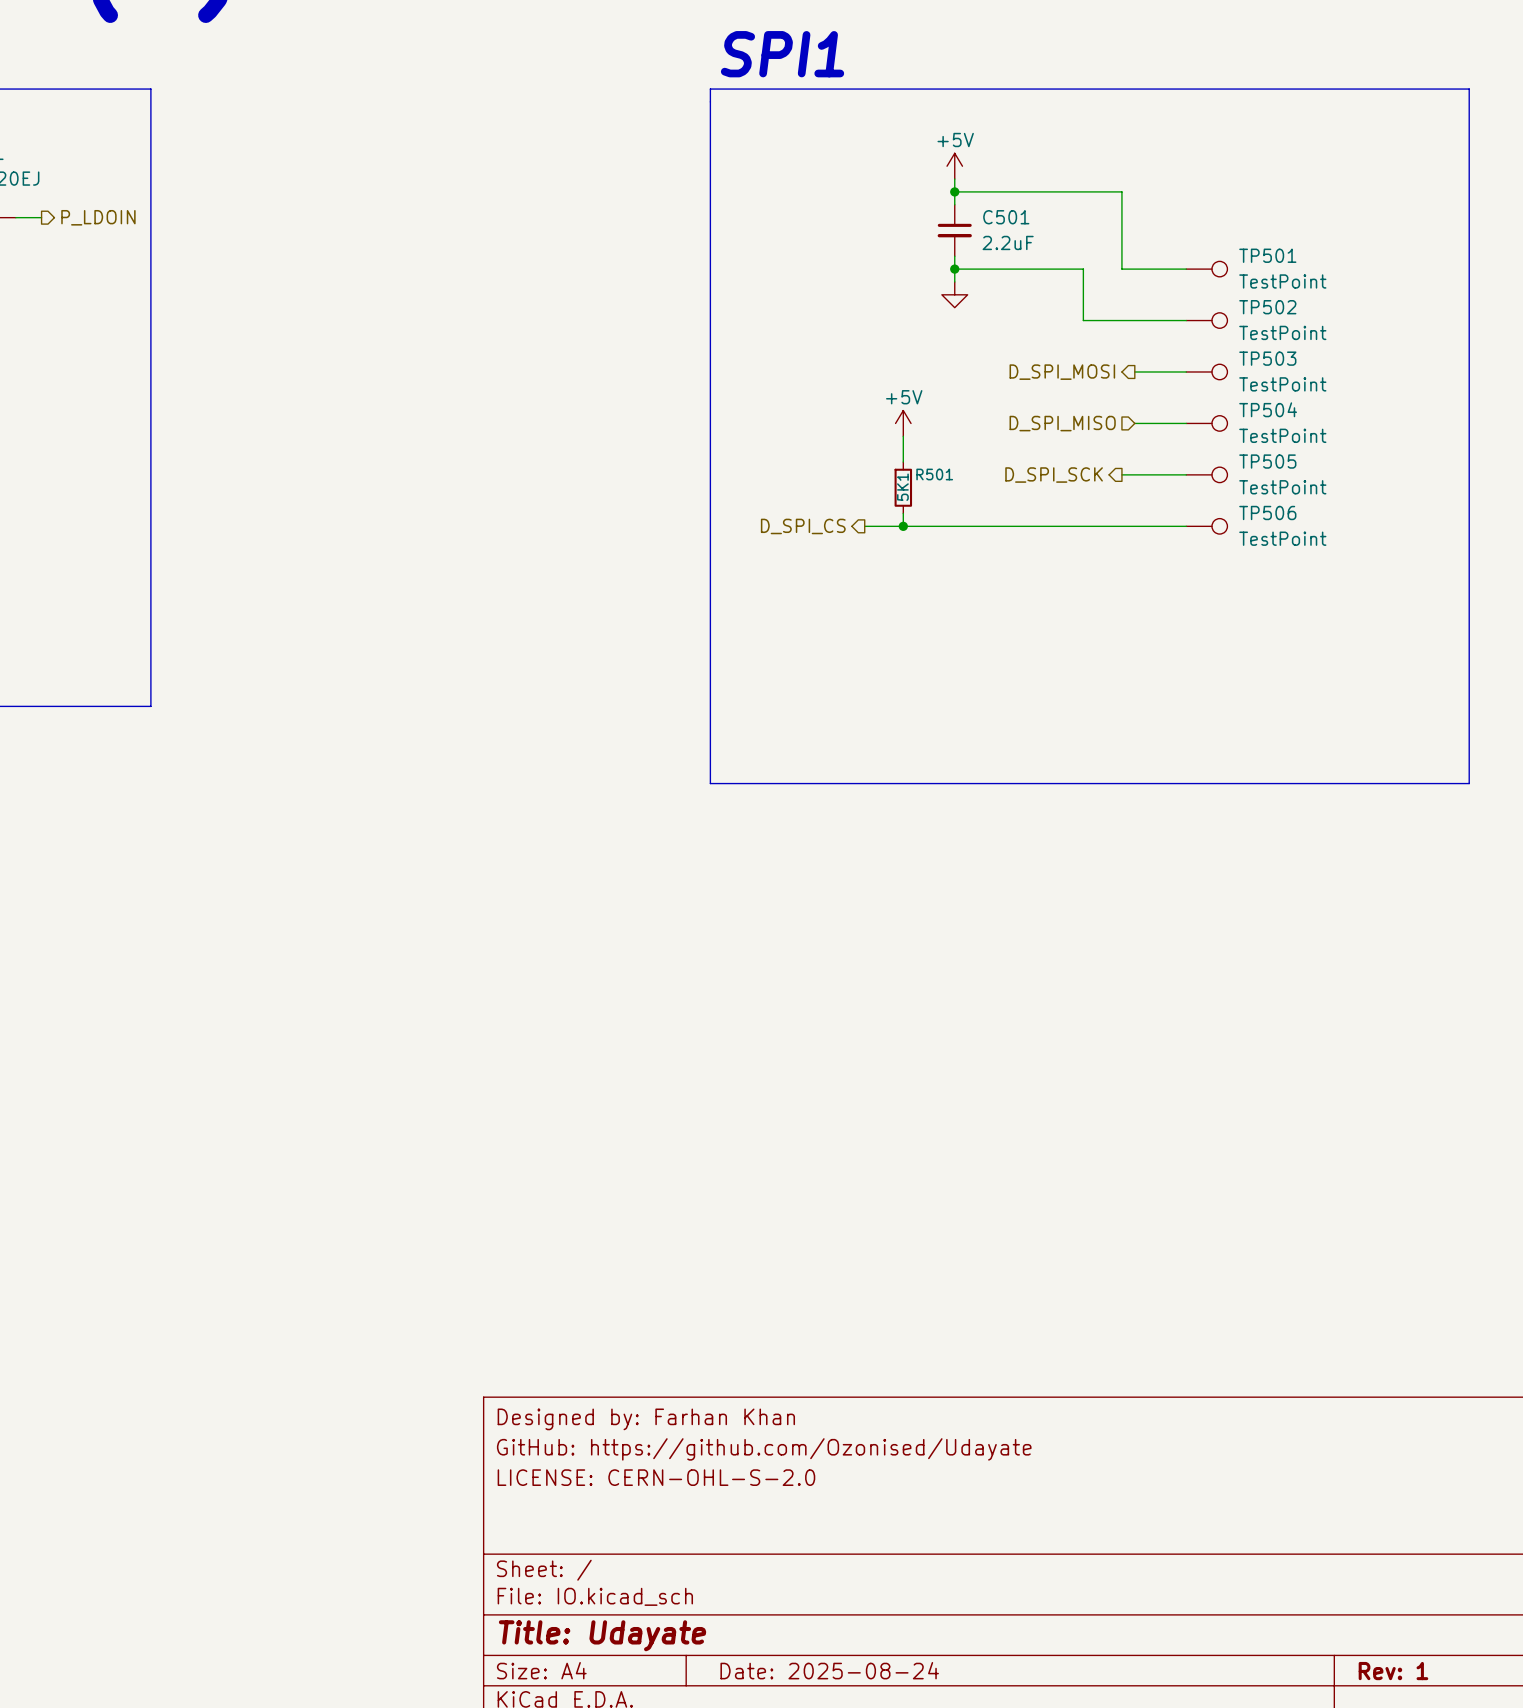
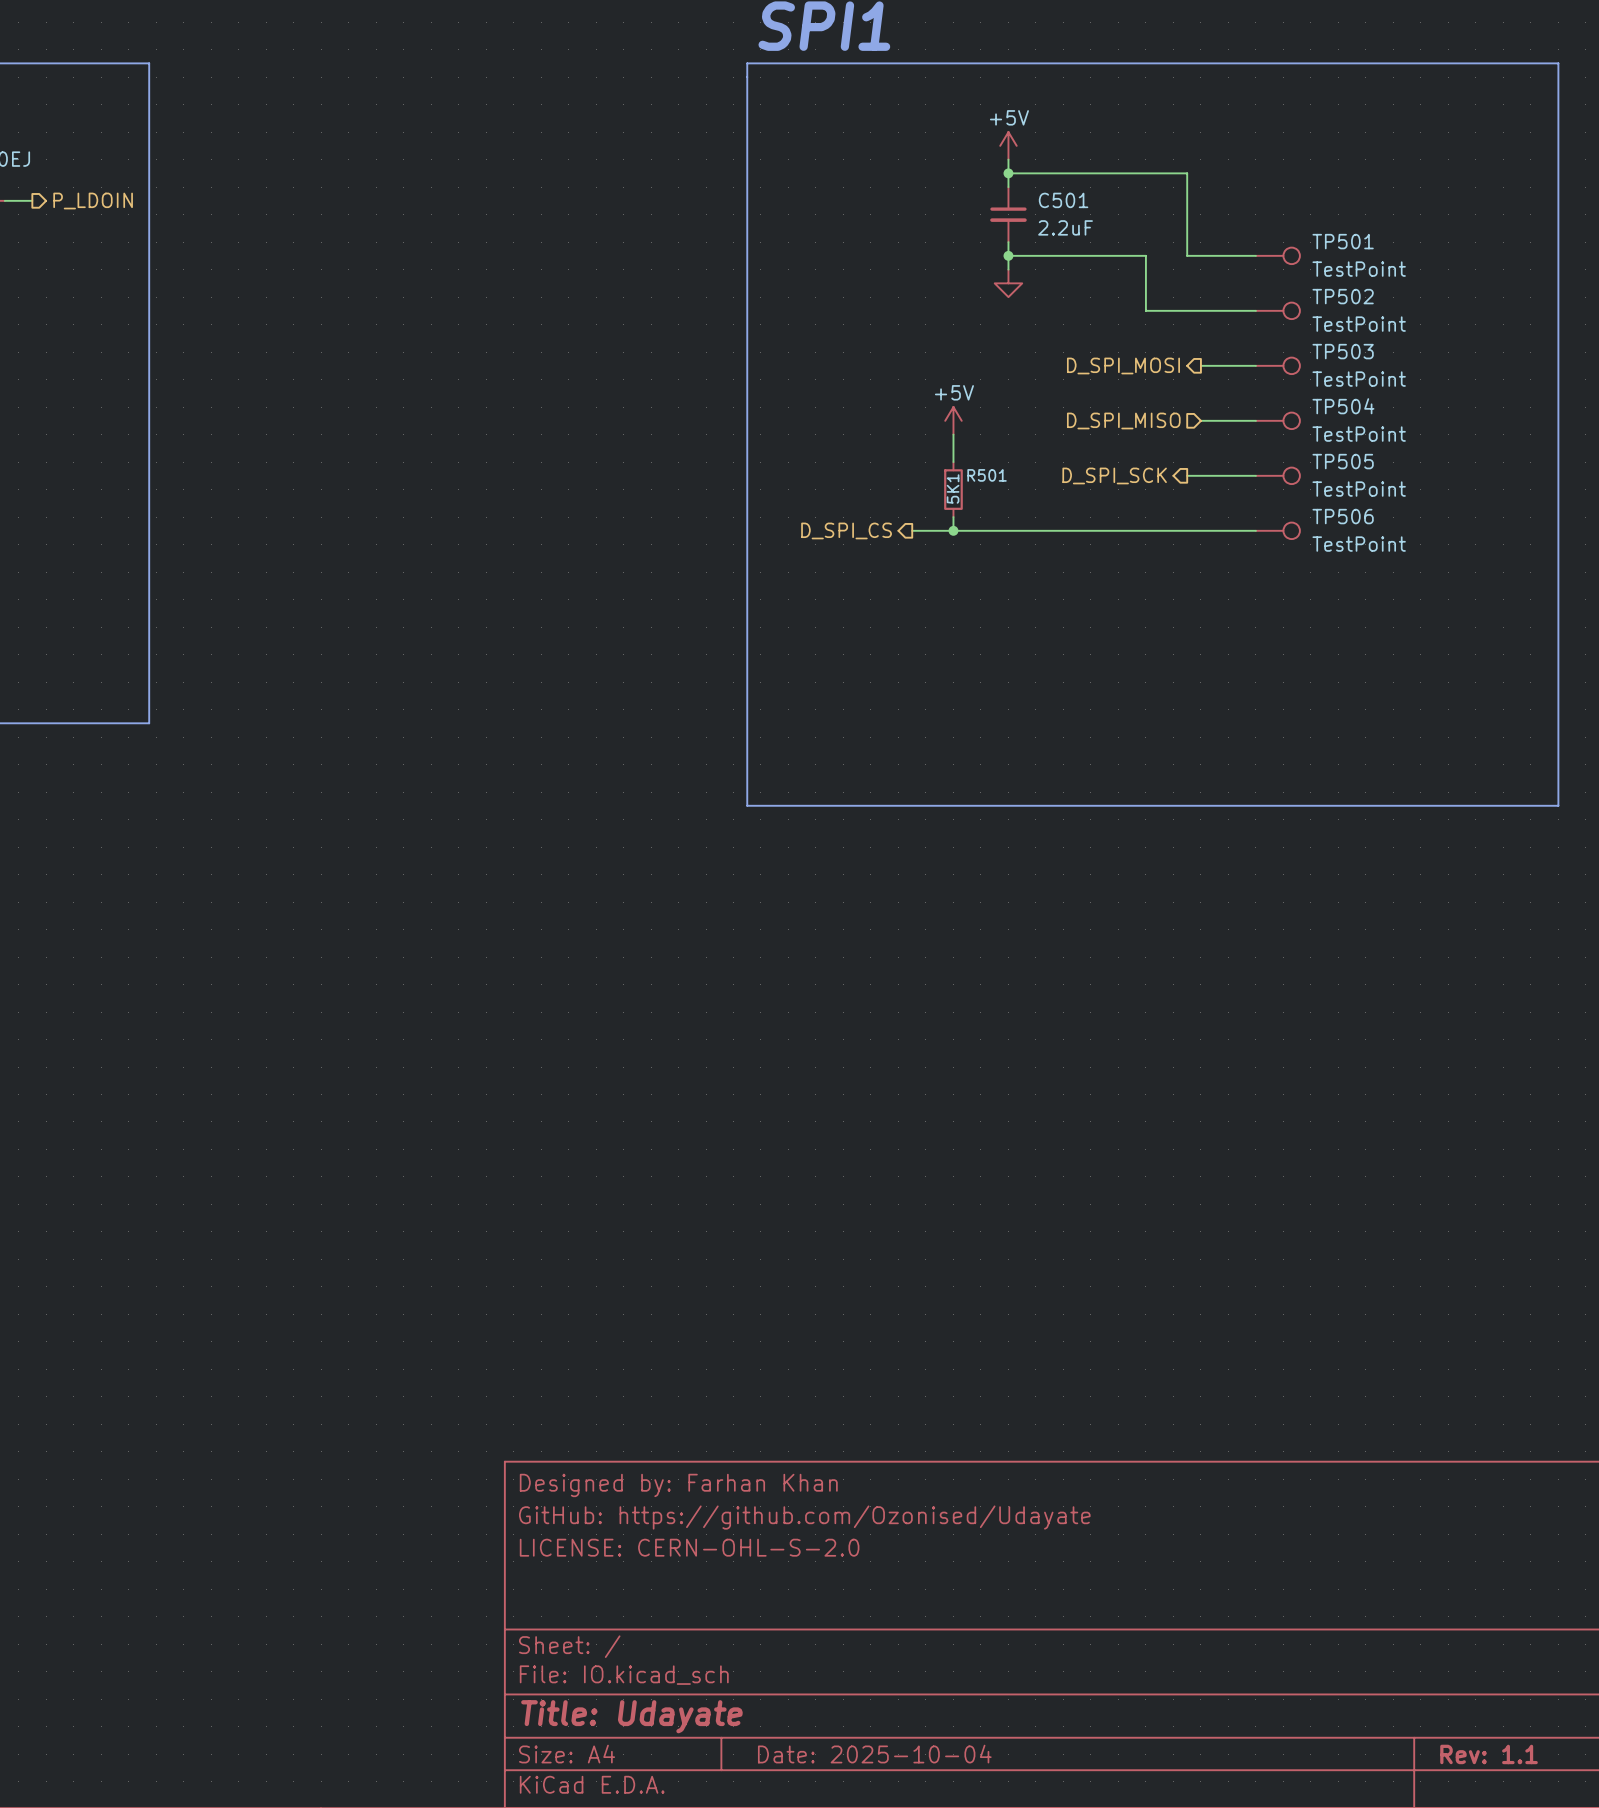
title block: Date: 2025-08-24 (829, 1670) -> Date: 2025-10-04 (874, 1754)
title block: Rev: 1 (1393, 1671) -> Rev: 1.1 (1489, 1754)

